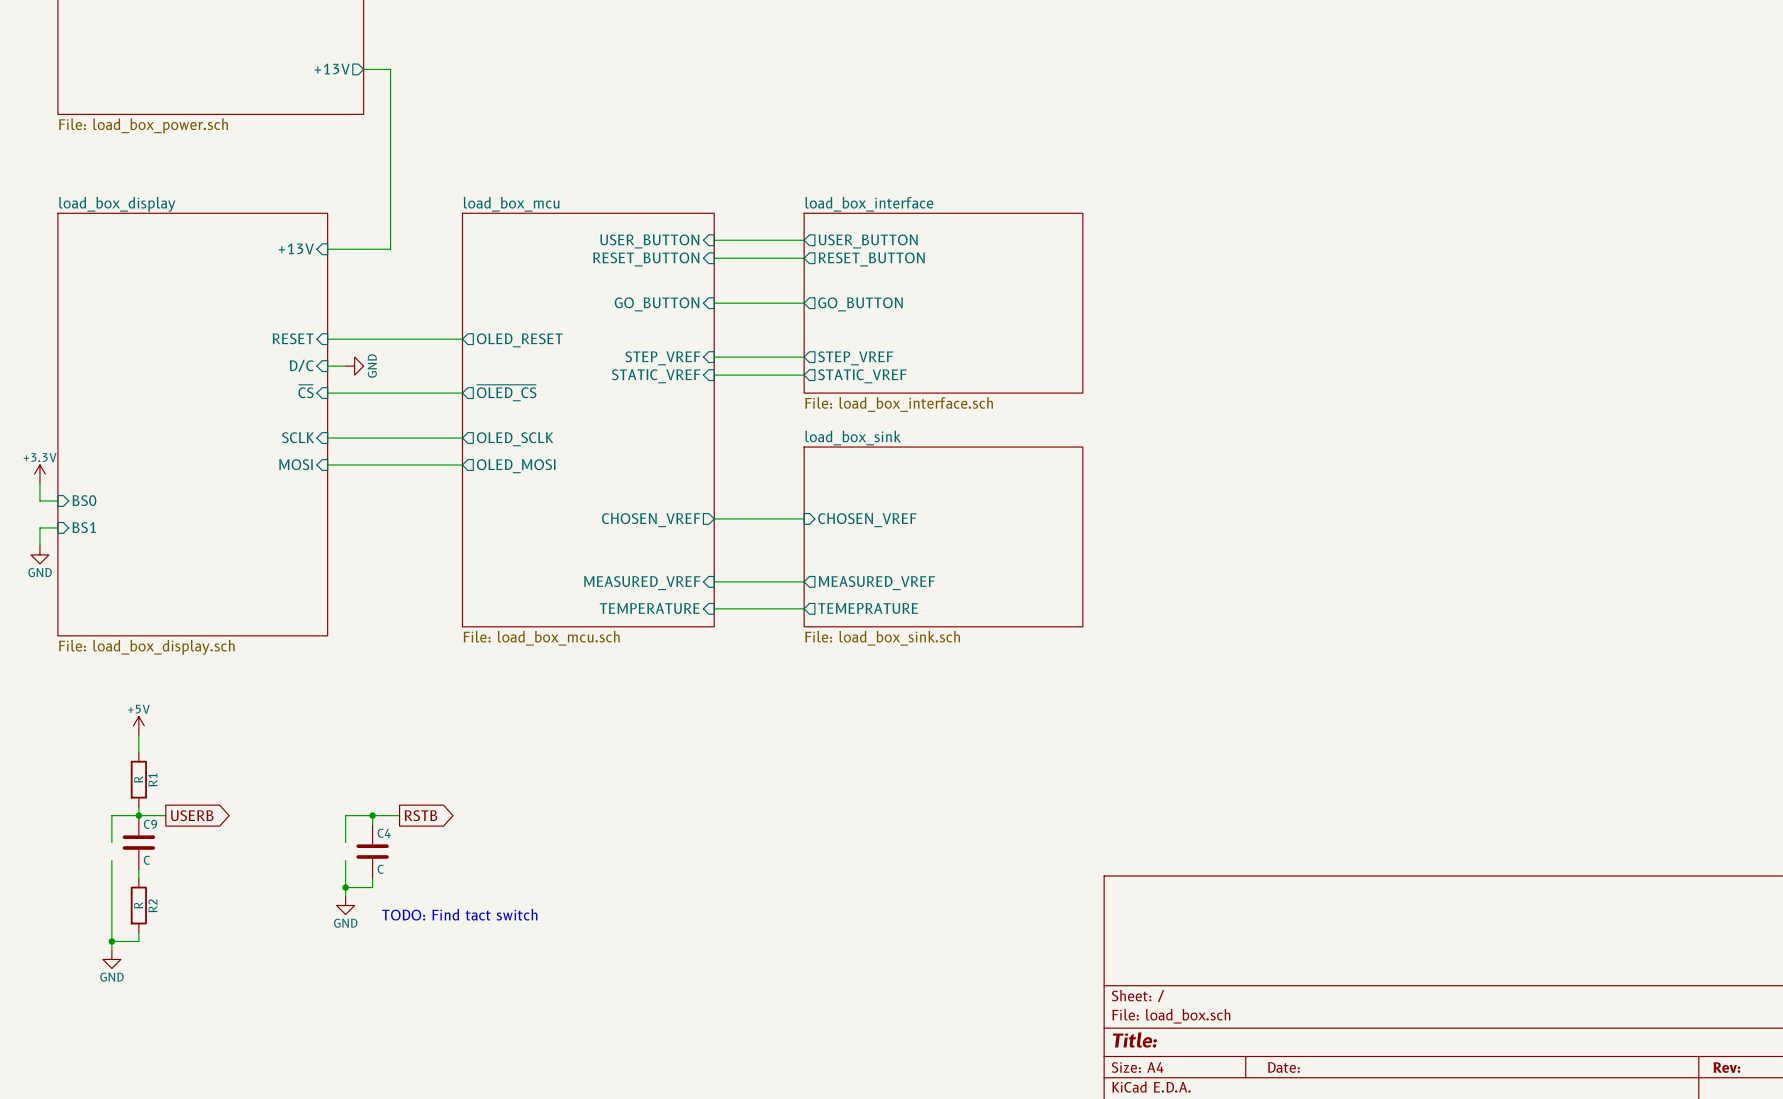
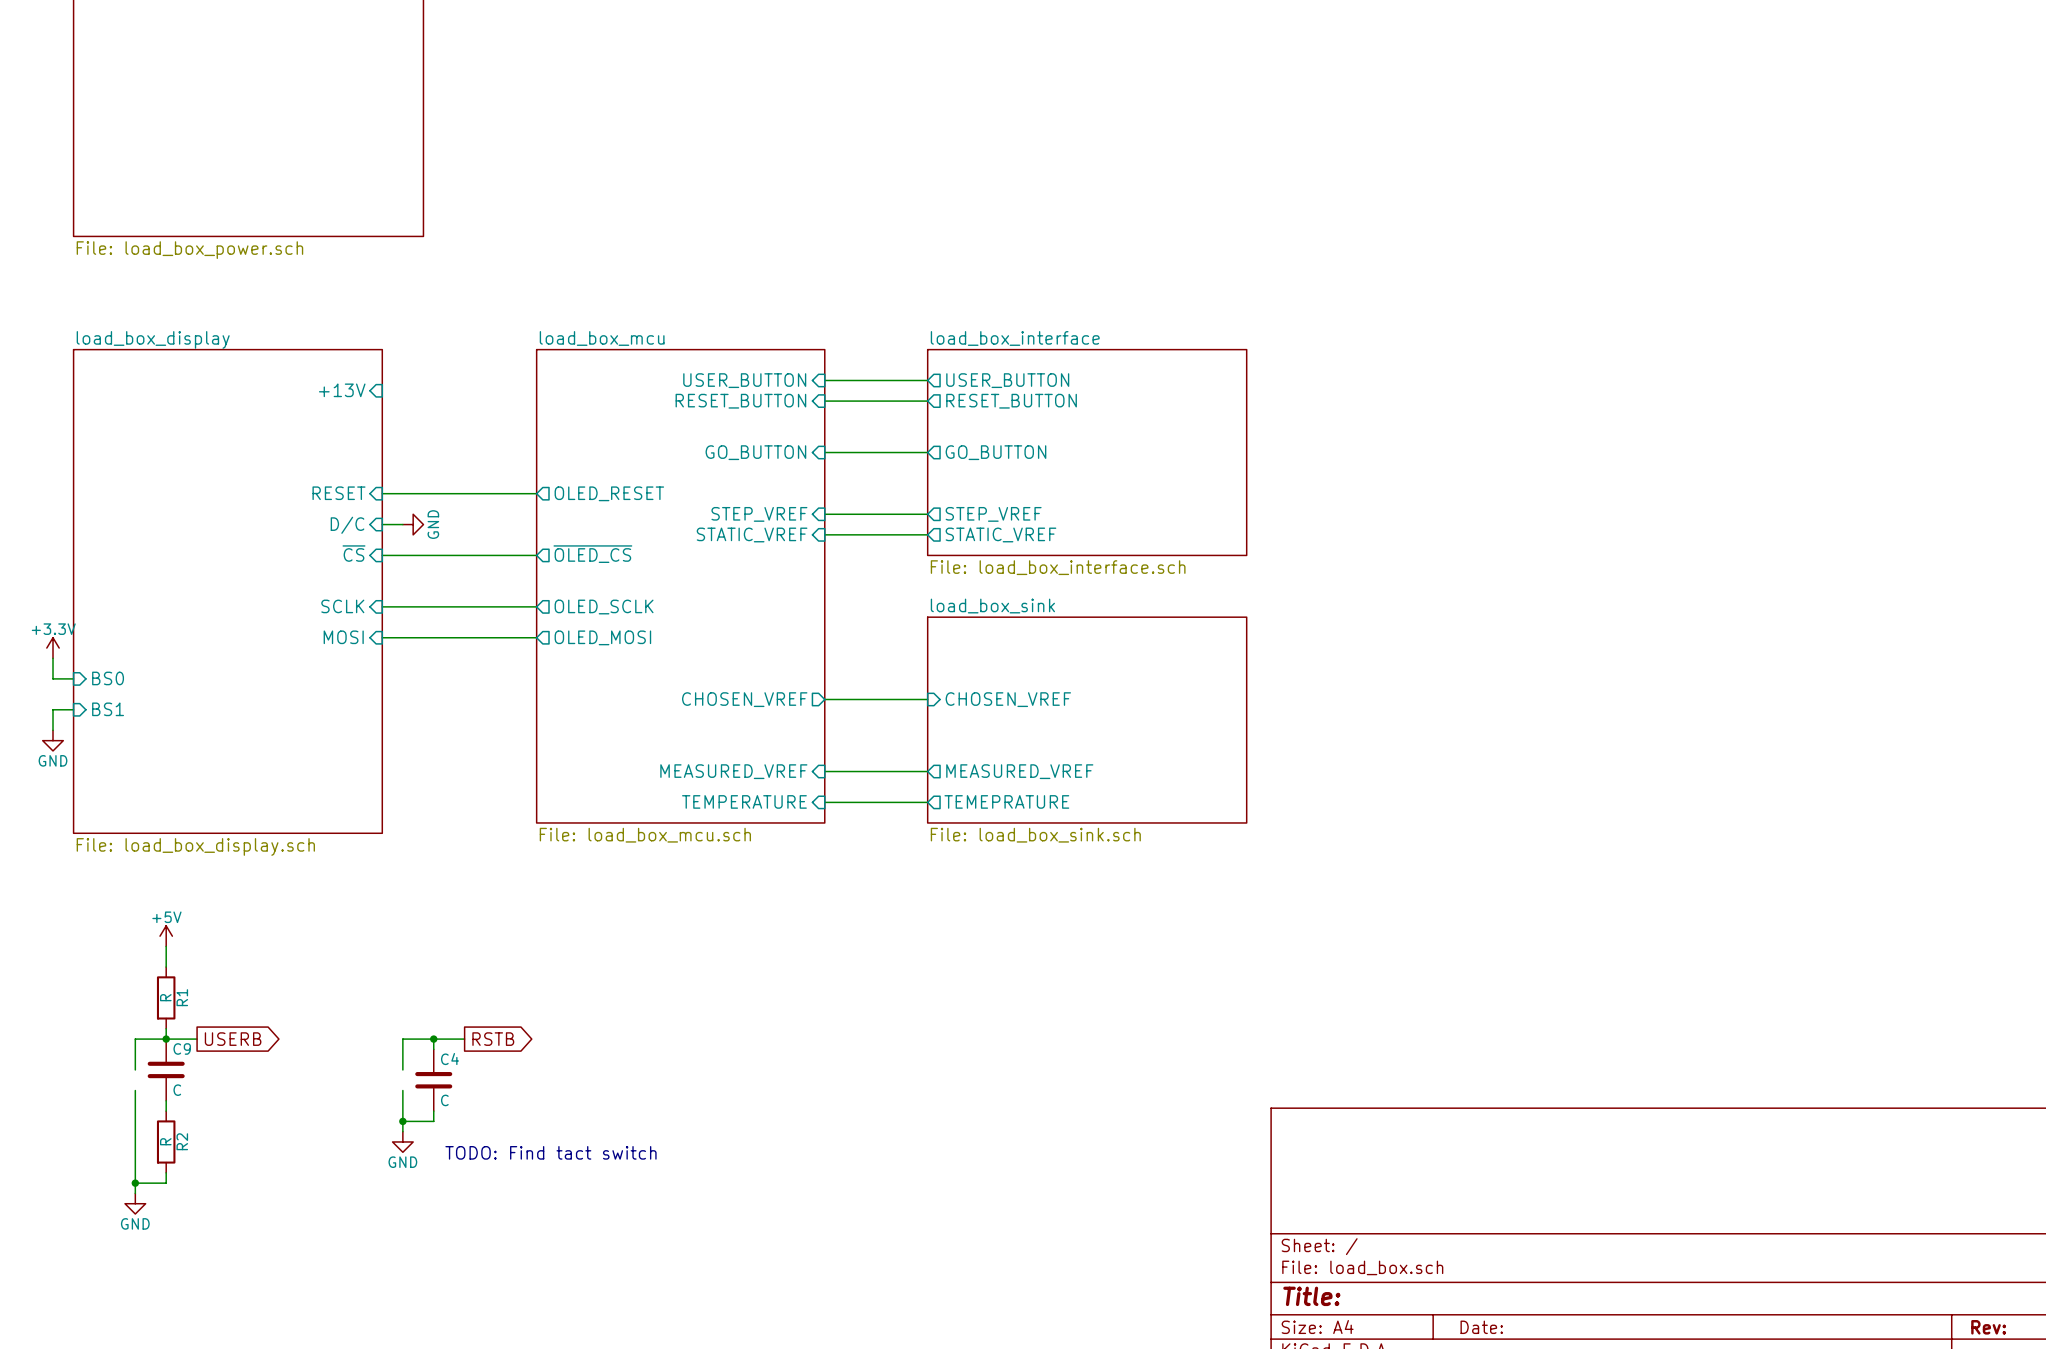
sheet pin: +13V (332, 69) -> none
wire: (363, 69) (390, 69) (390, 249) (327, 249) -> none

